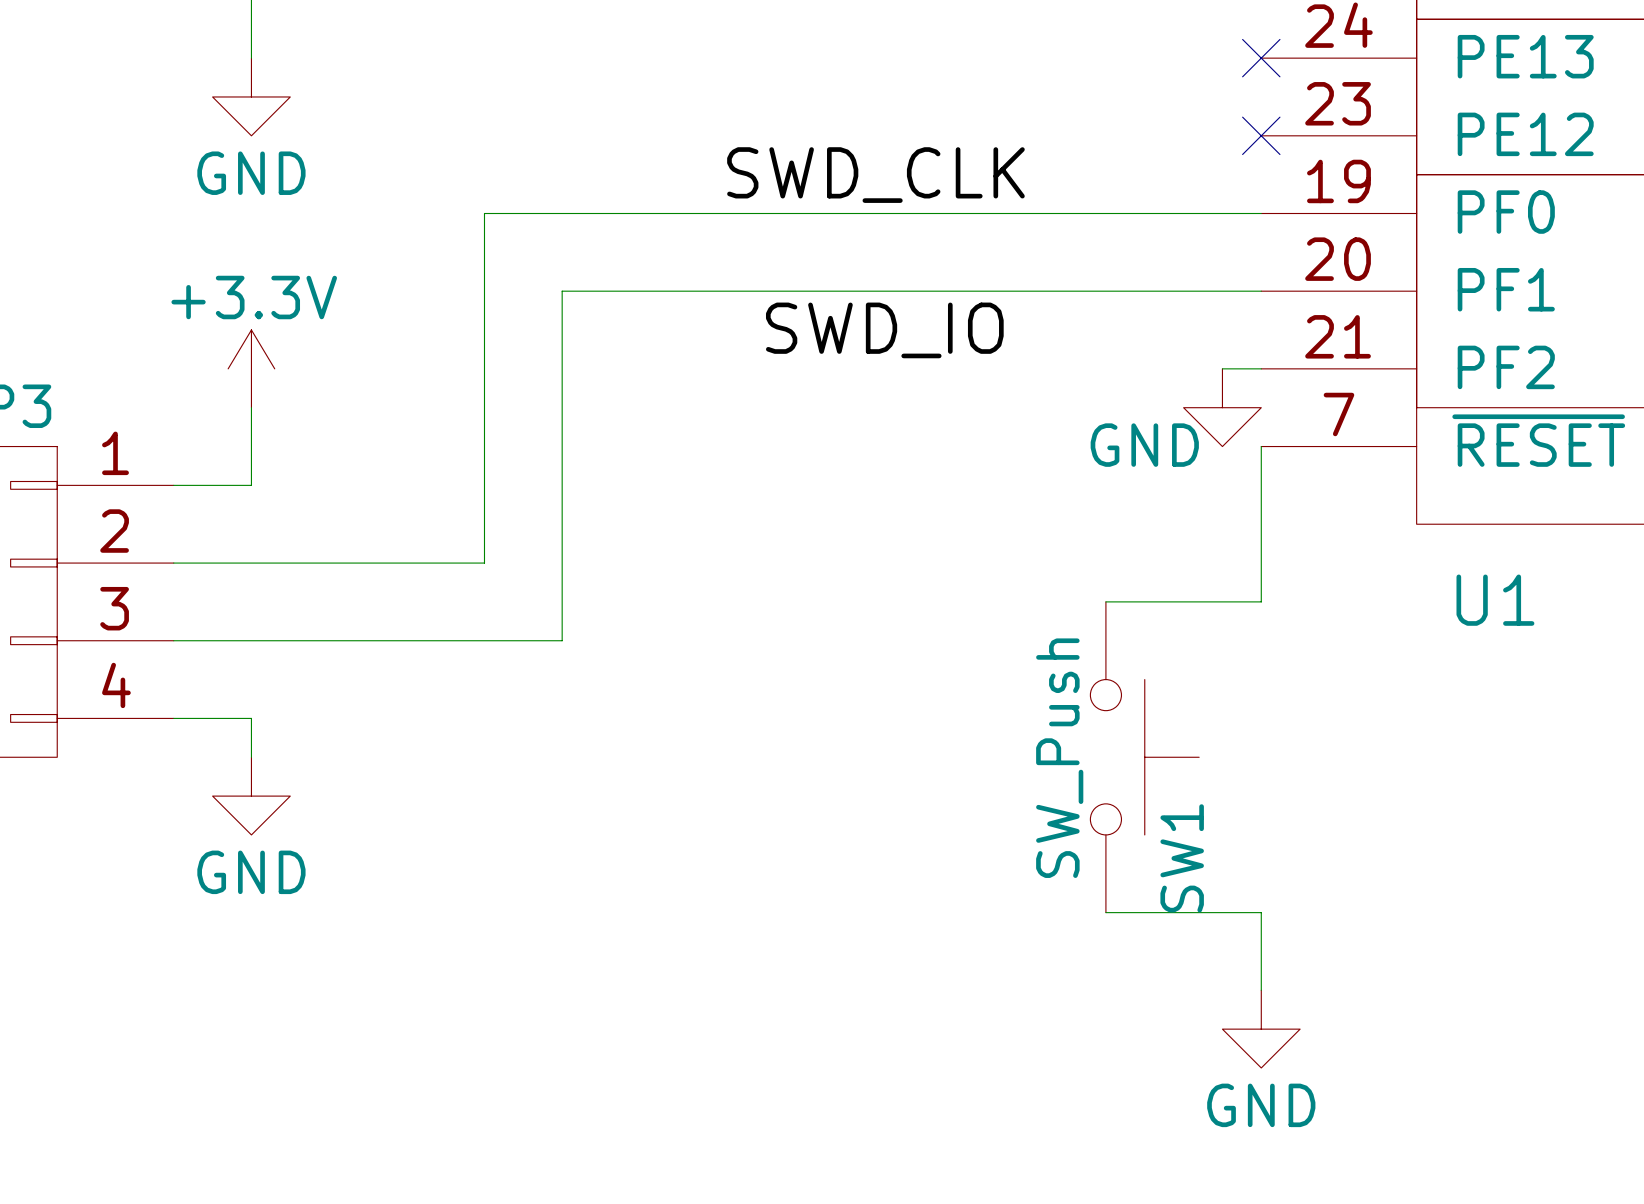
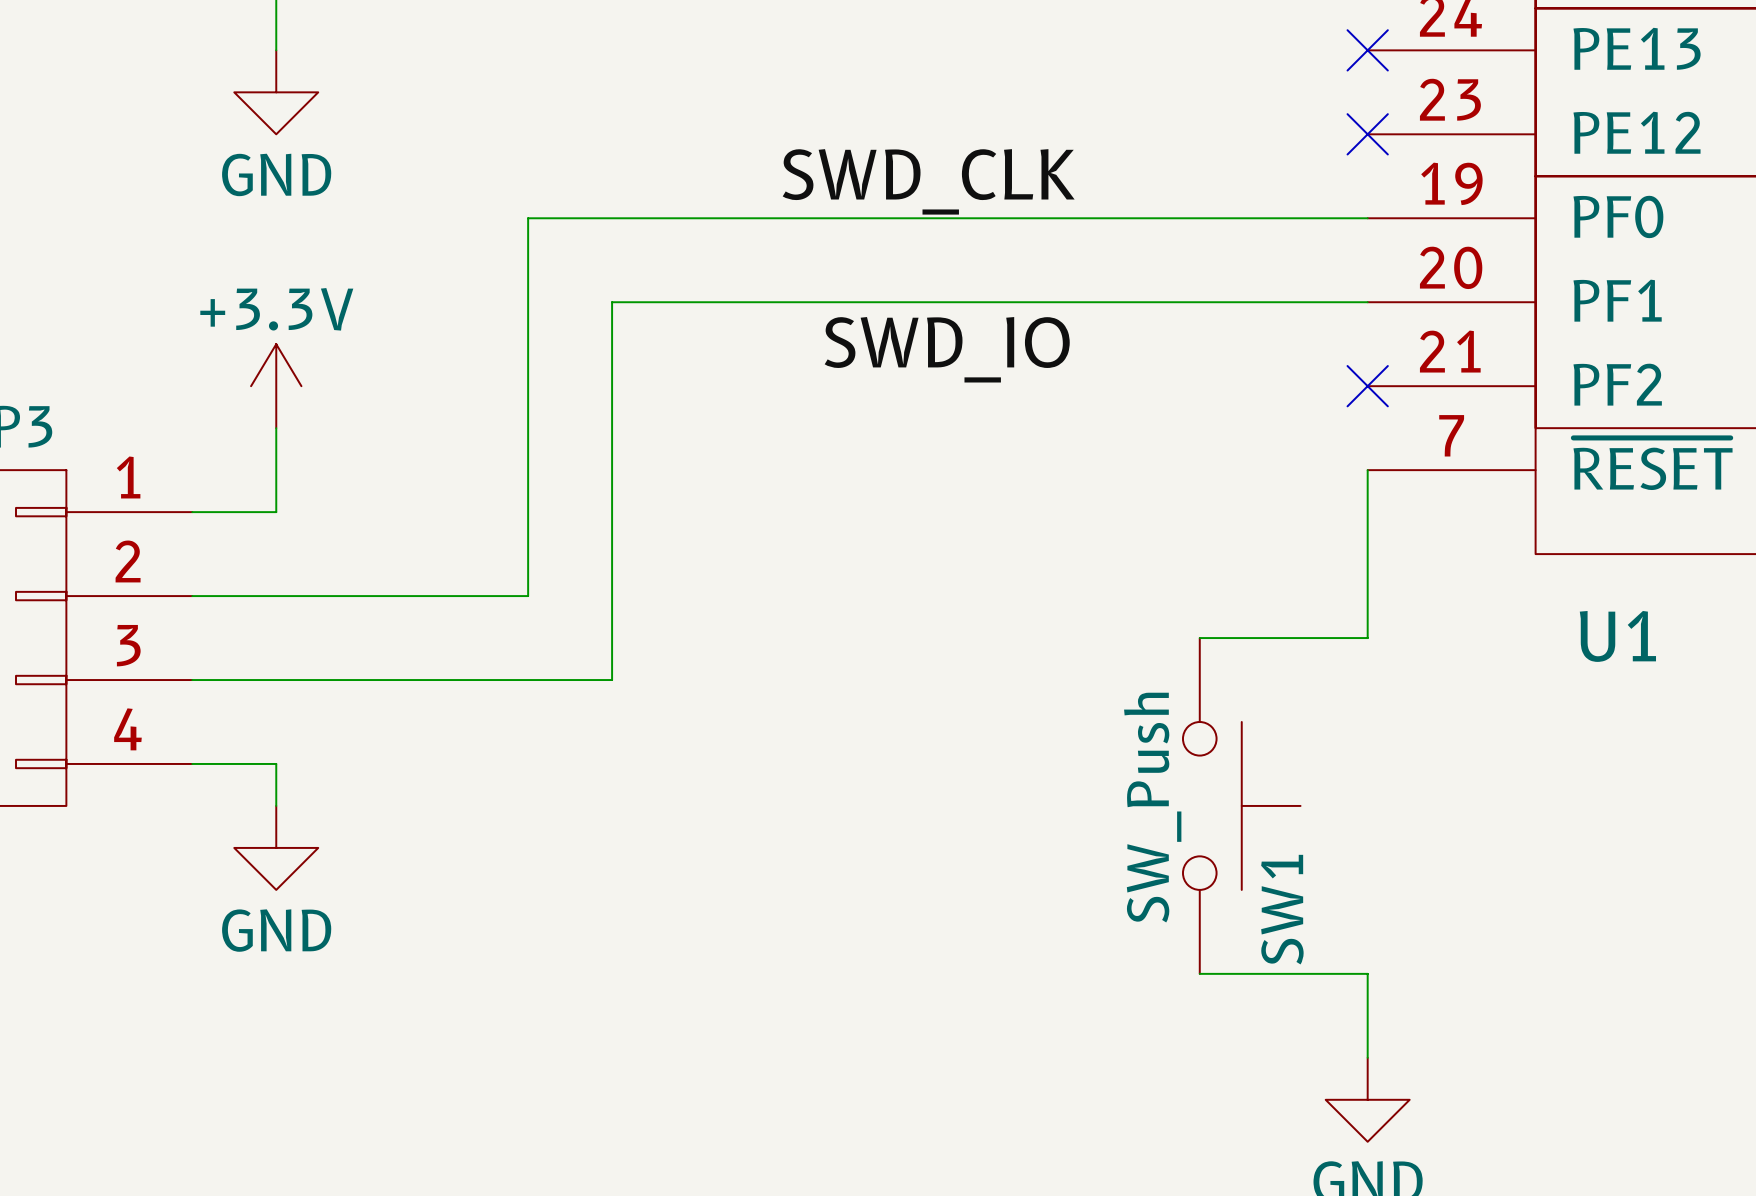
wire: (1222, 368) (1261, 368) -> none
no-connect mark: none -> (1367, 386)
power symbol: GND (1222, 407) -> none

